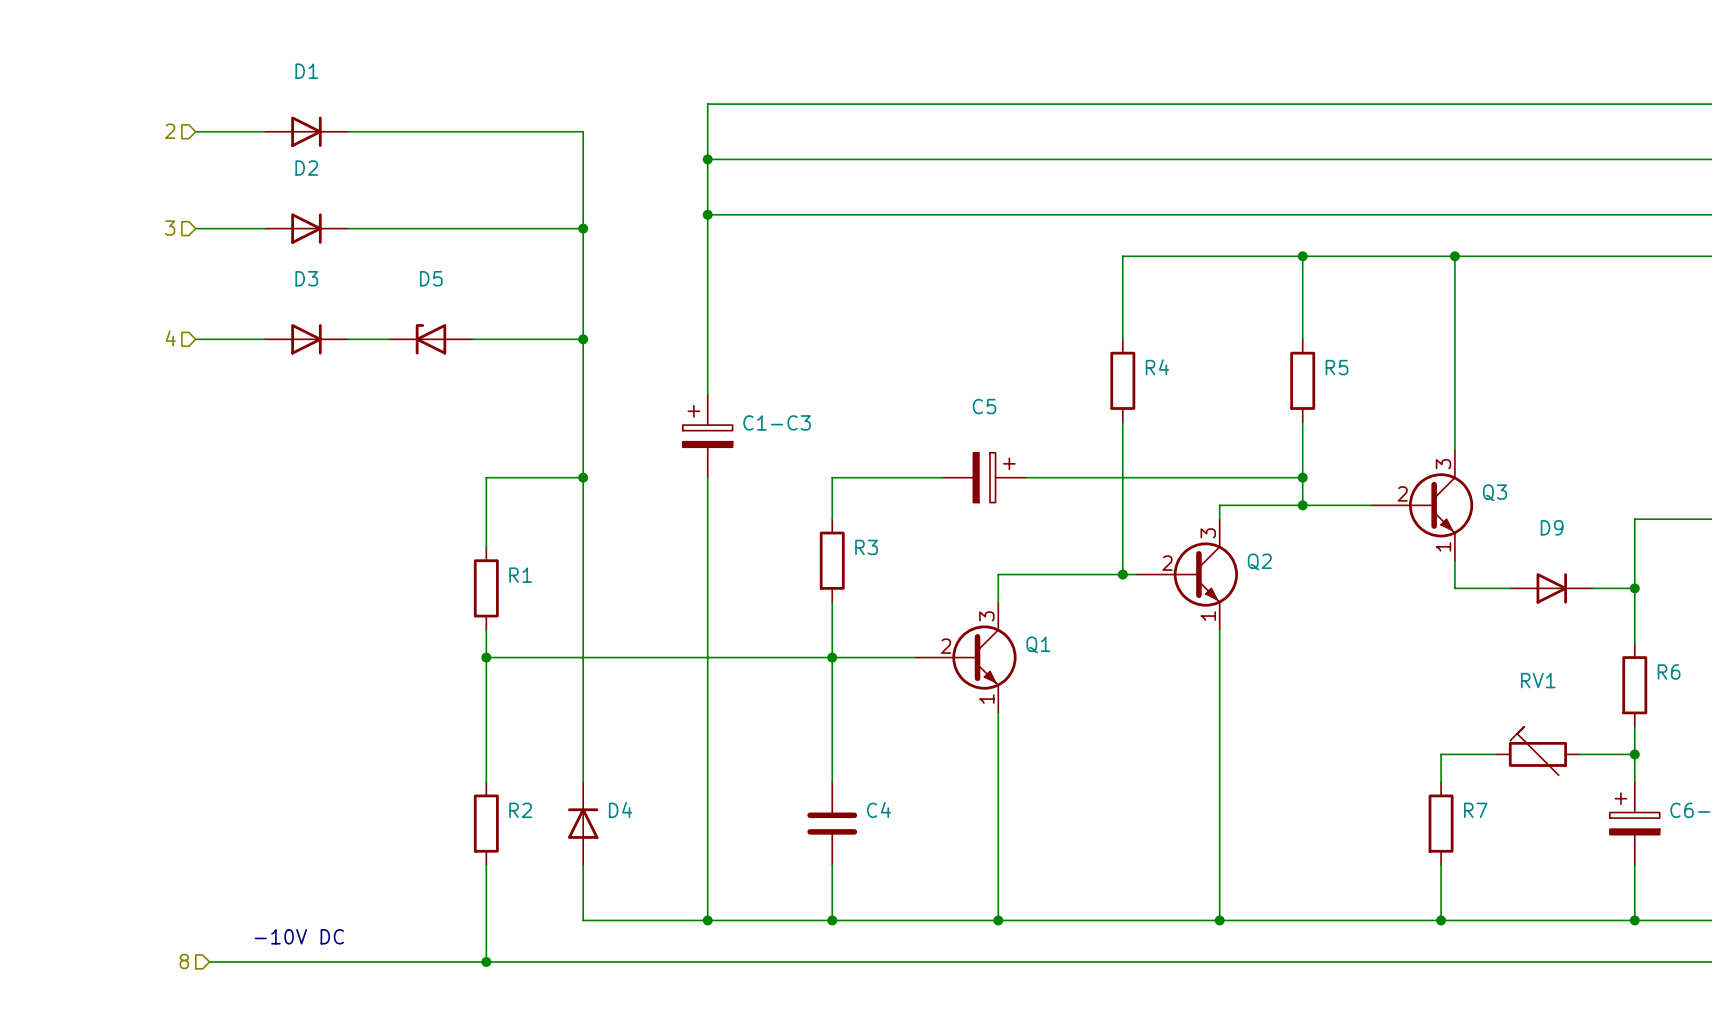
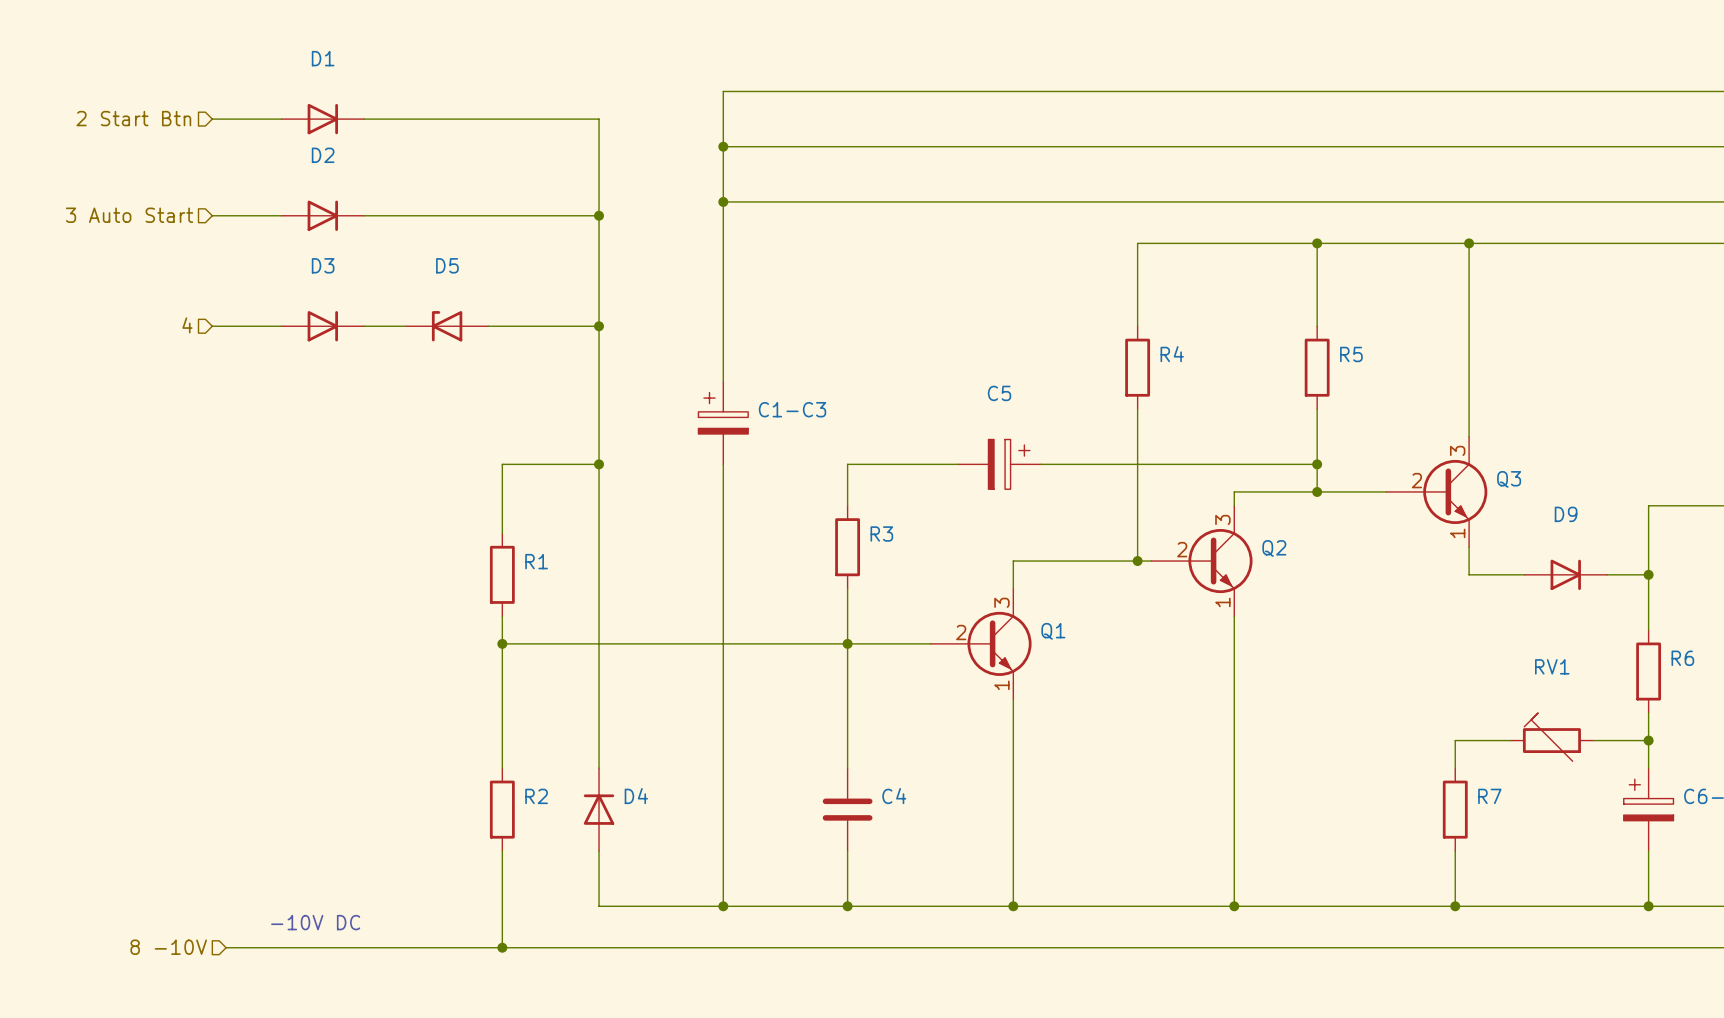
hierarchical label: 2 (170, 131) -> 2 Start Btn (133, 118)
hierarchical label: 3 (170, 228) -> 3 Auto Start (129, 215)
hierarchical label: 8 (184, 961) -> 8 -10V (168, 947)

